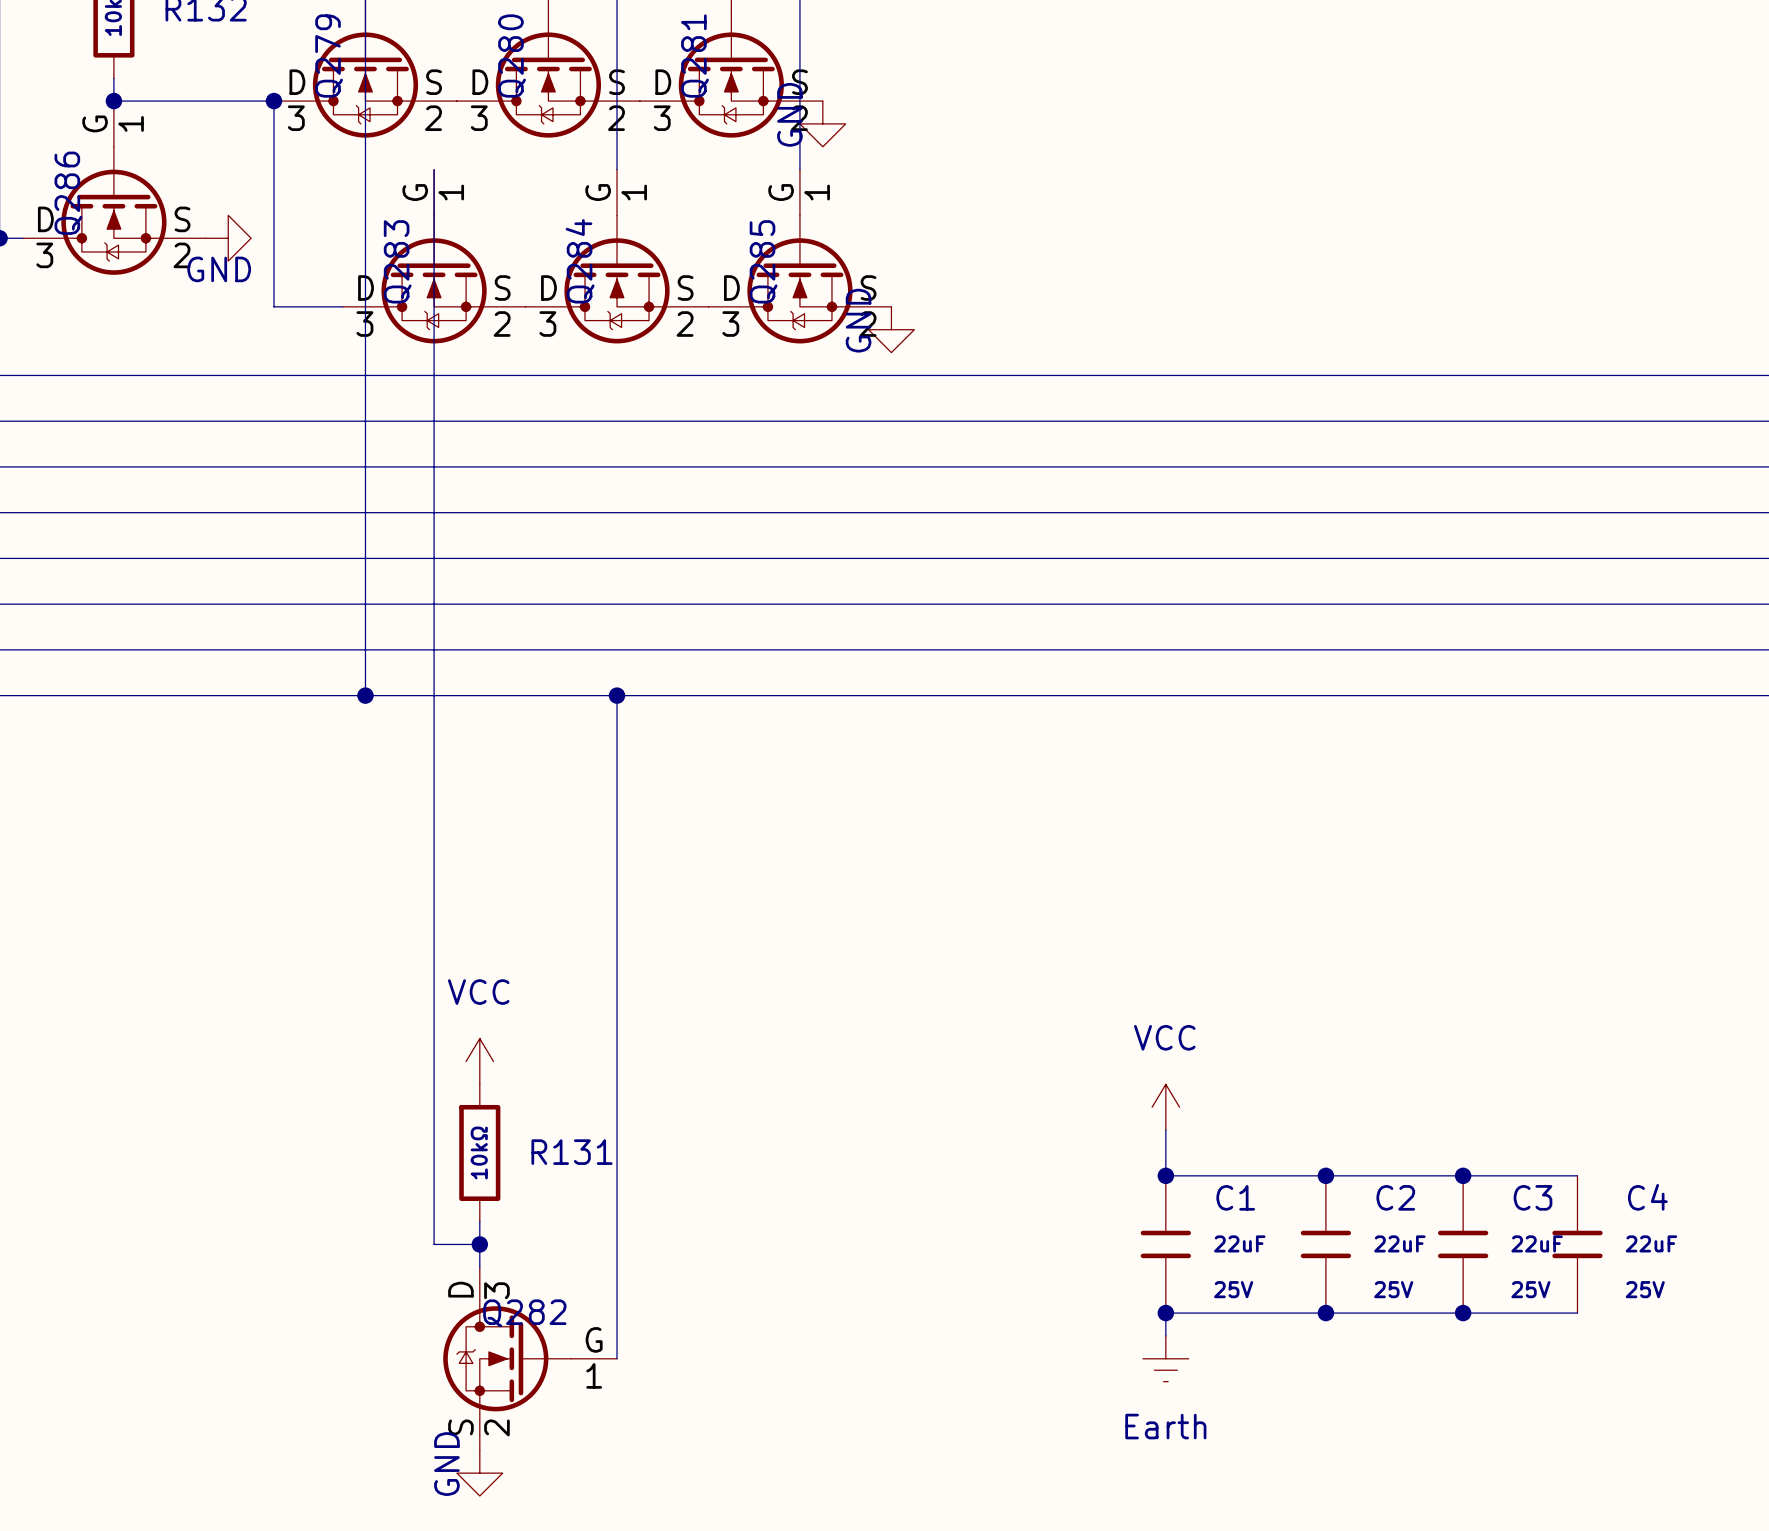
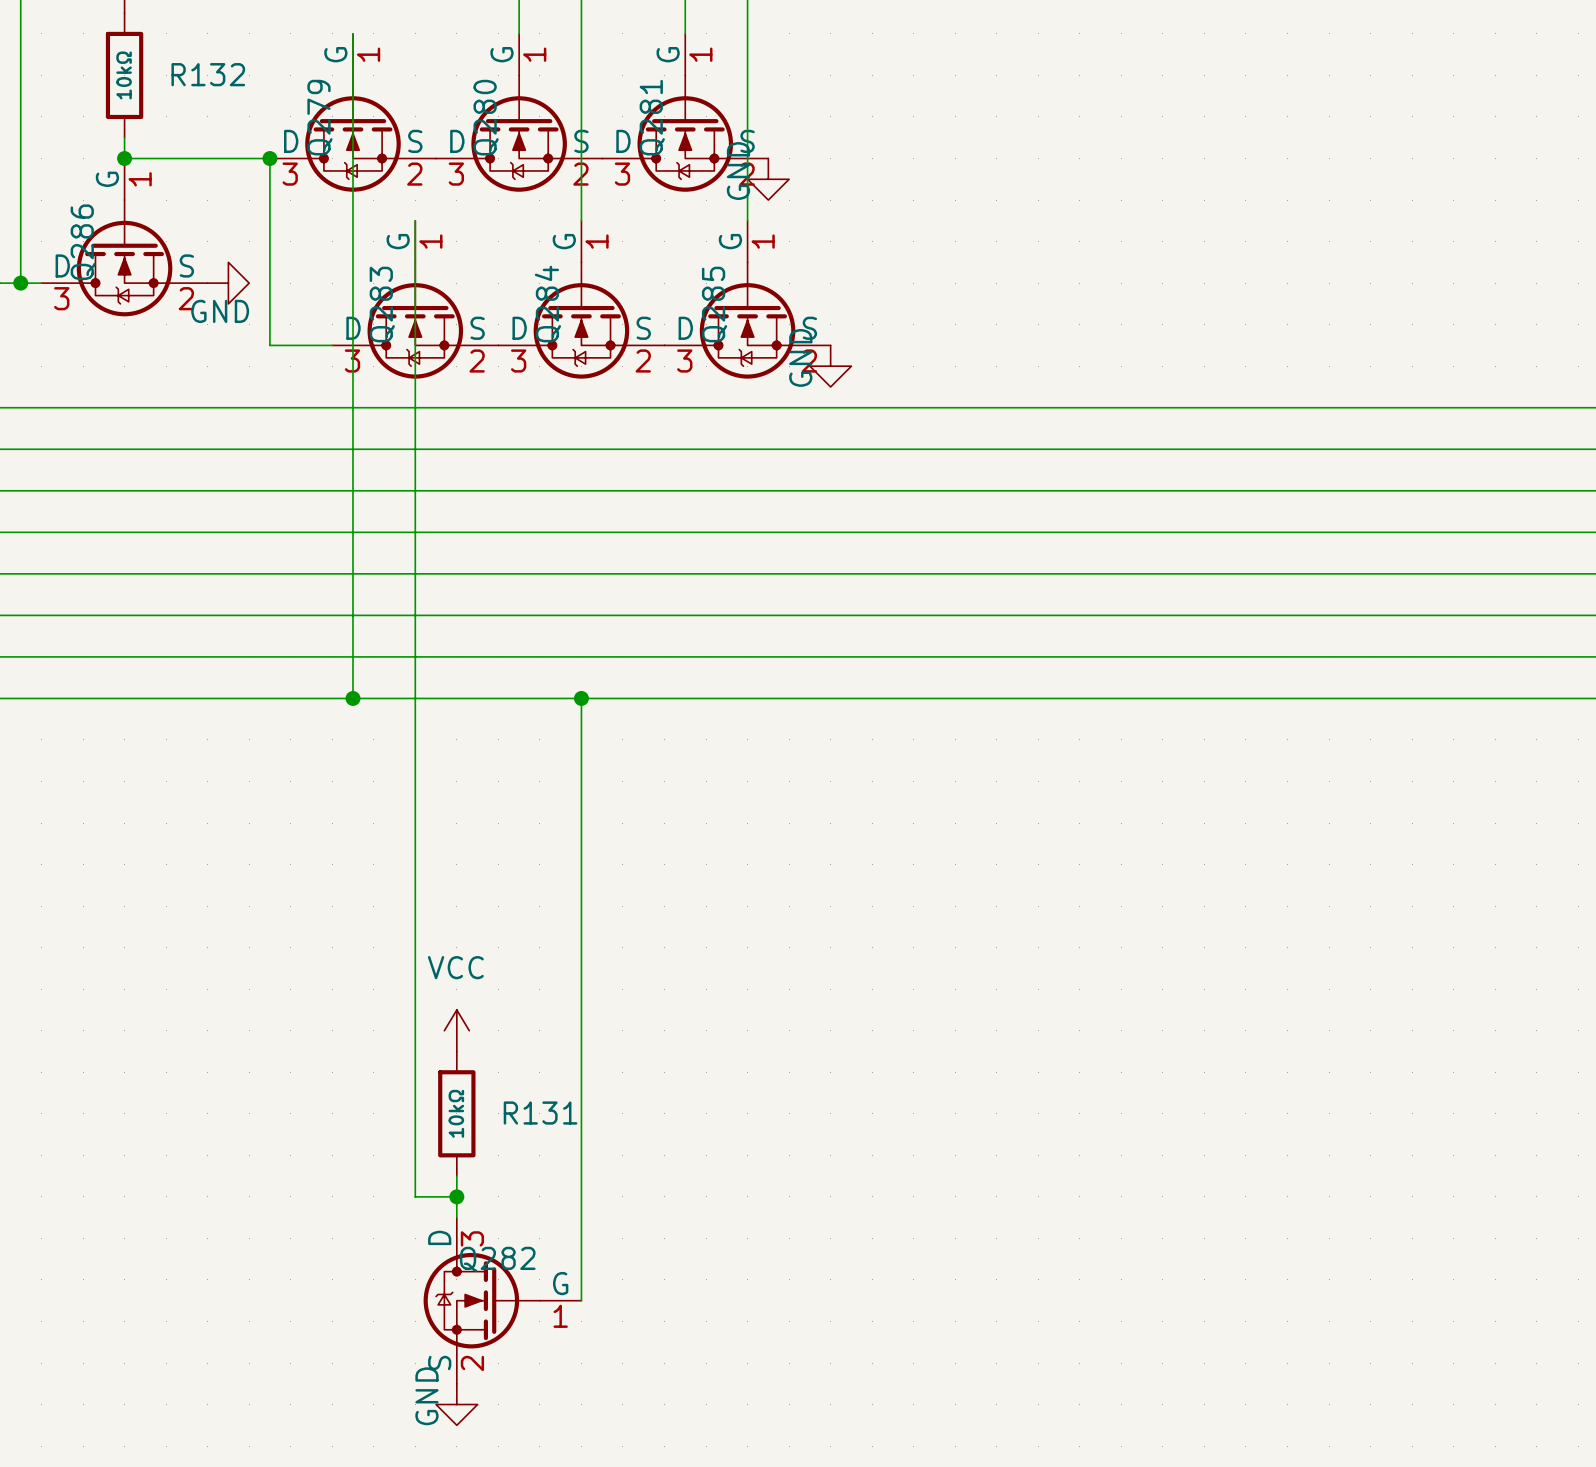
power symbol: VCC (1165, 1107) -> none
wire: (1165, 1130) (1165, 1175) (1577, 1175) -> none
junction: (1165, 1175) -> none
junction: (1325, 1175) -> none
junction: (1463, 1175) -> none
C1: 22uF (1165, 1244) -> none
C2: 22uF (1325, 1244) -> none
C3: 22uF (1463, 1244) -> none
C4: 22uF (1577, 1244) -> none
junction: (1165, 1313) -> none
junction: (1325, 1313) -> none
junction: (1463, 1313) -> none
wire: (1577, 1313) (1165, 1313) (1165, 1335) -> none
power symbol: Earth (1165, 1358) -> none

